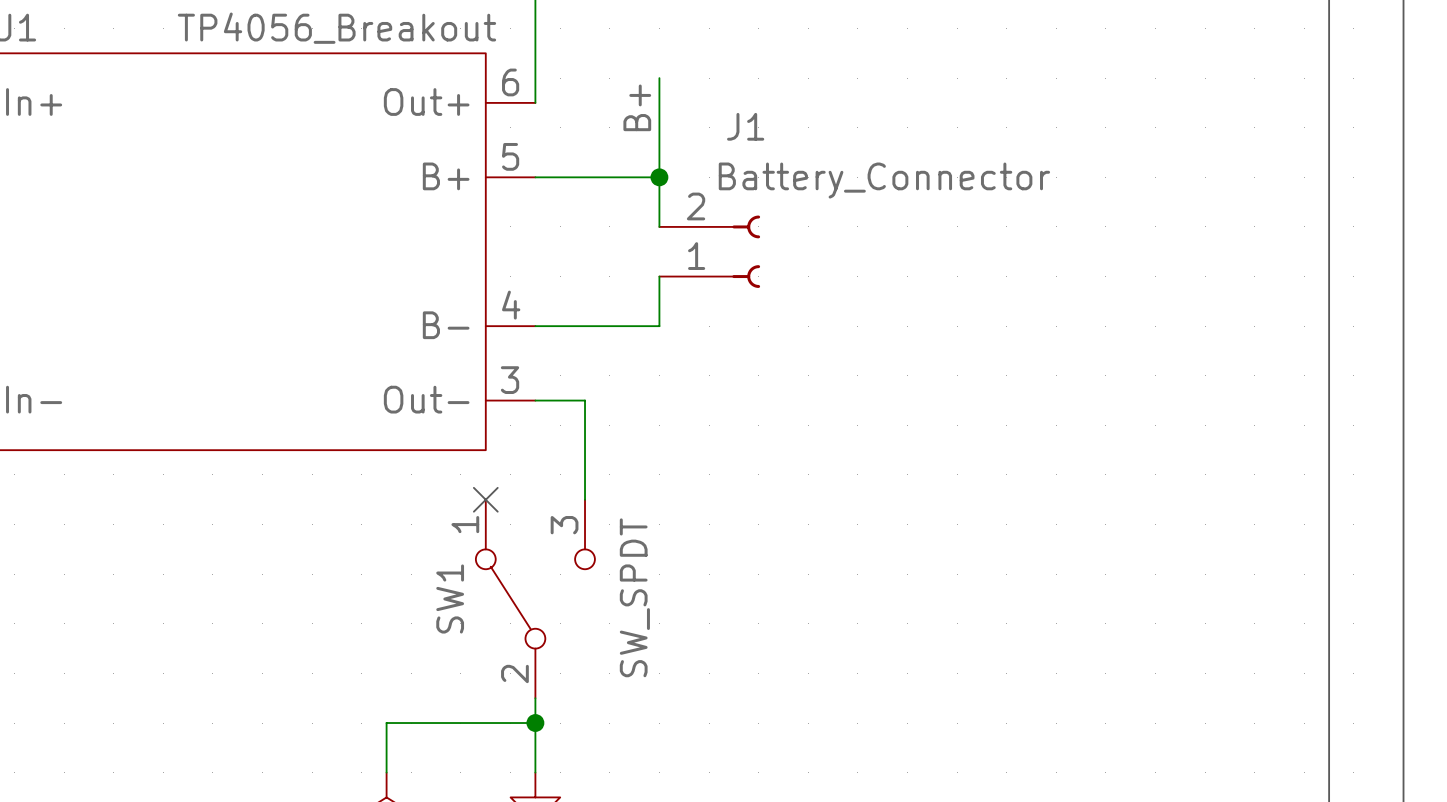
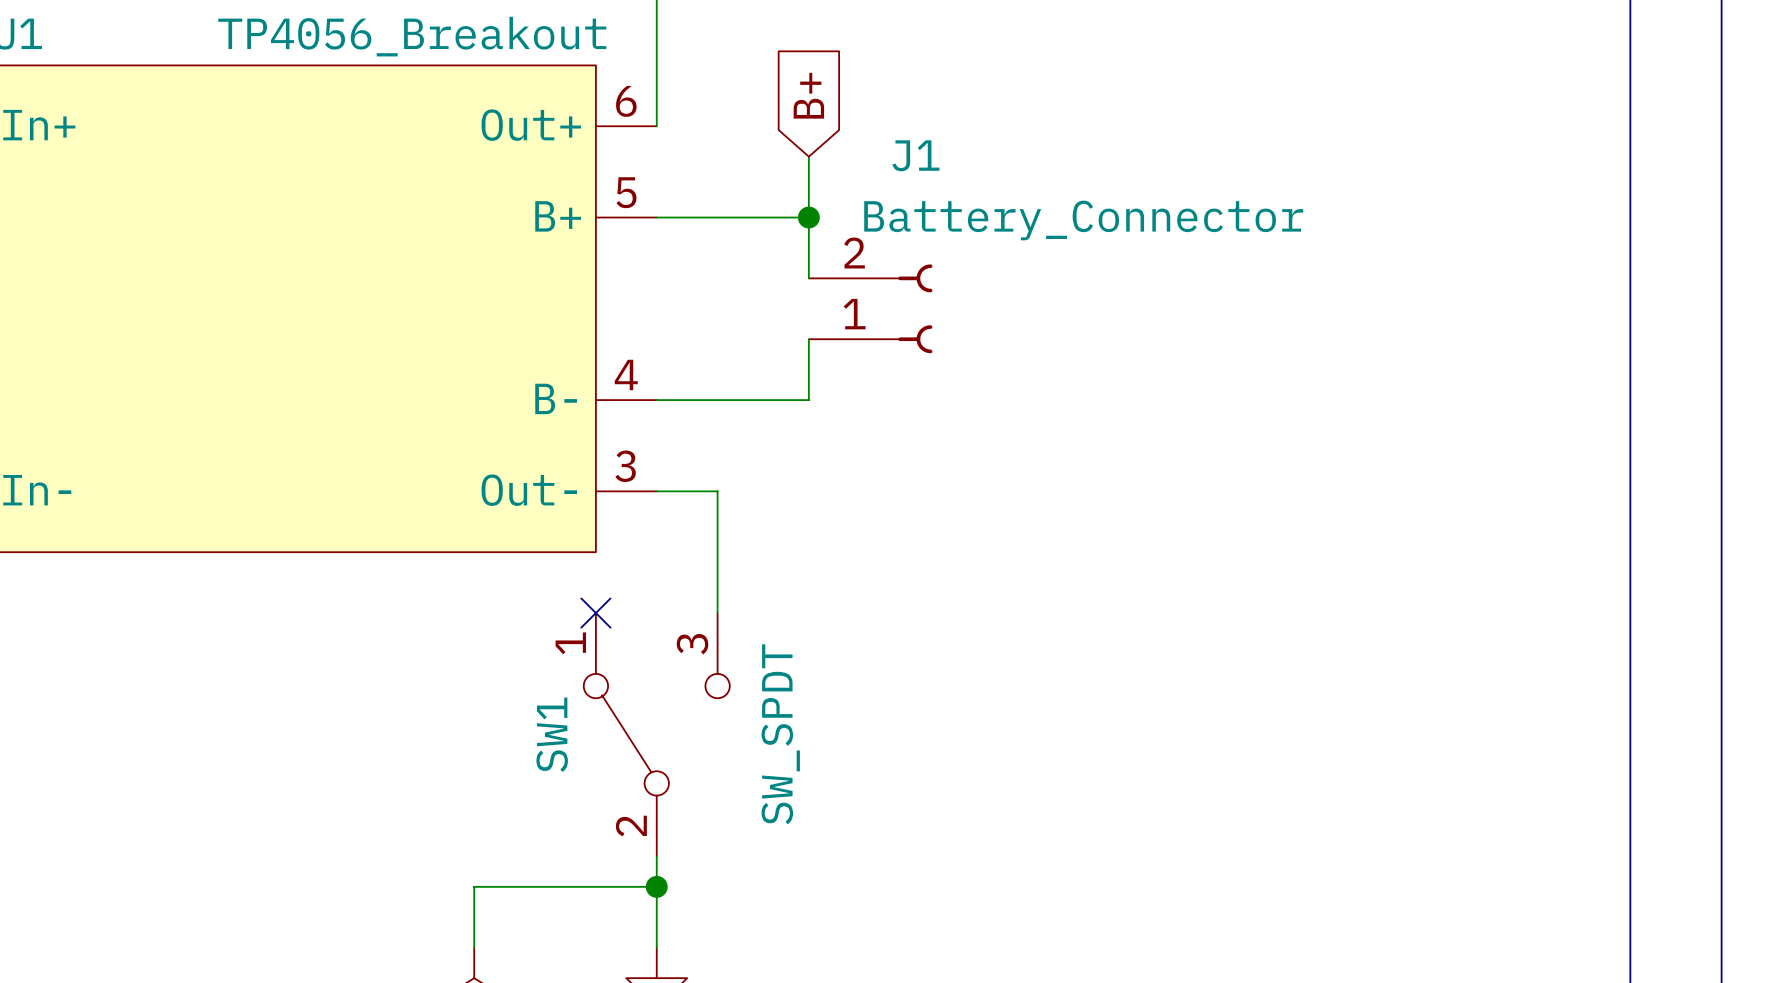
global label: none -> B+ (808, 95)
wire: (659, 78) (659, 127) -> none
label: B+ (637, 107) -> none

